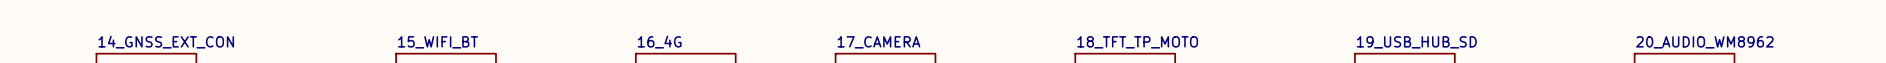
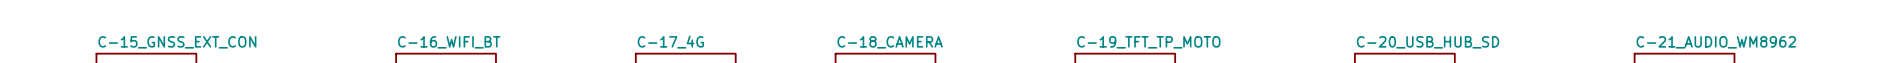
sheet 14_GNSS_EXT_CON name: 14_GNSS_EXT_CON (166, 42) -> C-15_GNSS_EXT_CON (177, 42)
sheet 15_WIFI_BT name: 15_WIFI_BT (438, 42) -> C-16_WIFI_BT (449, 42)
sheet 16_4G name: 16_4G (659, 42) -> C-17_4G (670, 42)
sheet 17_CAMERA name: 17_CAMERA (878, 42) -> C-18_CAMERA (890, 42)
sheet 18_TFT_TP_MOTO name: 18_TFT_TP_MOTO (1137, 42) -> C-19_TFT_TP_MOTO (1148, 42)
sheet 19_USB_HUB_SD name: 19_USB_HUB_SD (1416, 42) -> C-20_USB_HUB_SD (1428, 42)
sheet 20_AUDIO_WM8962 name: 20_AUDIO_WM8962 (1704, 42) -> C-21_AUDIO_WM8962 (1716, 42)

